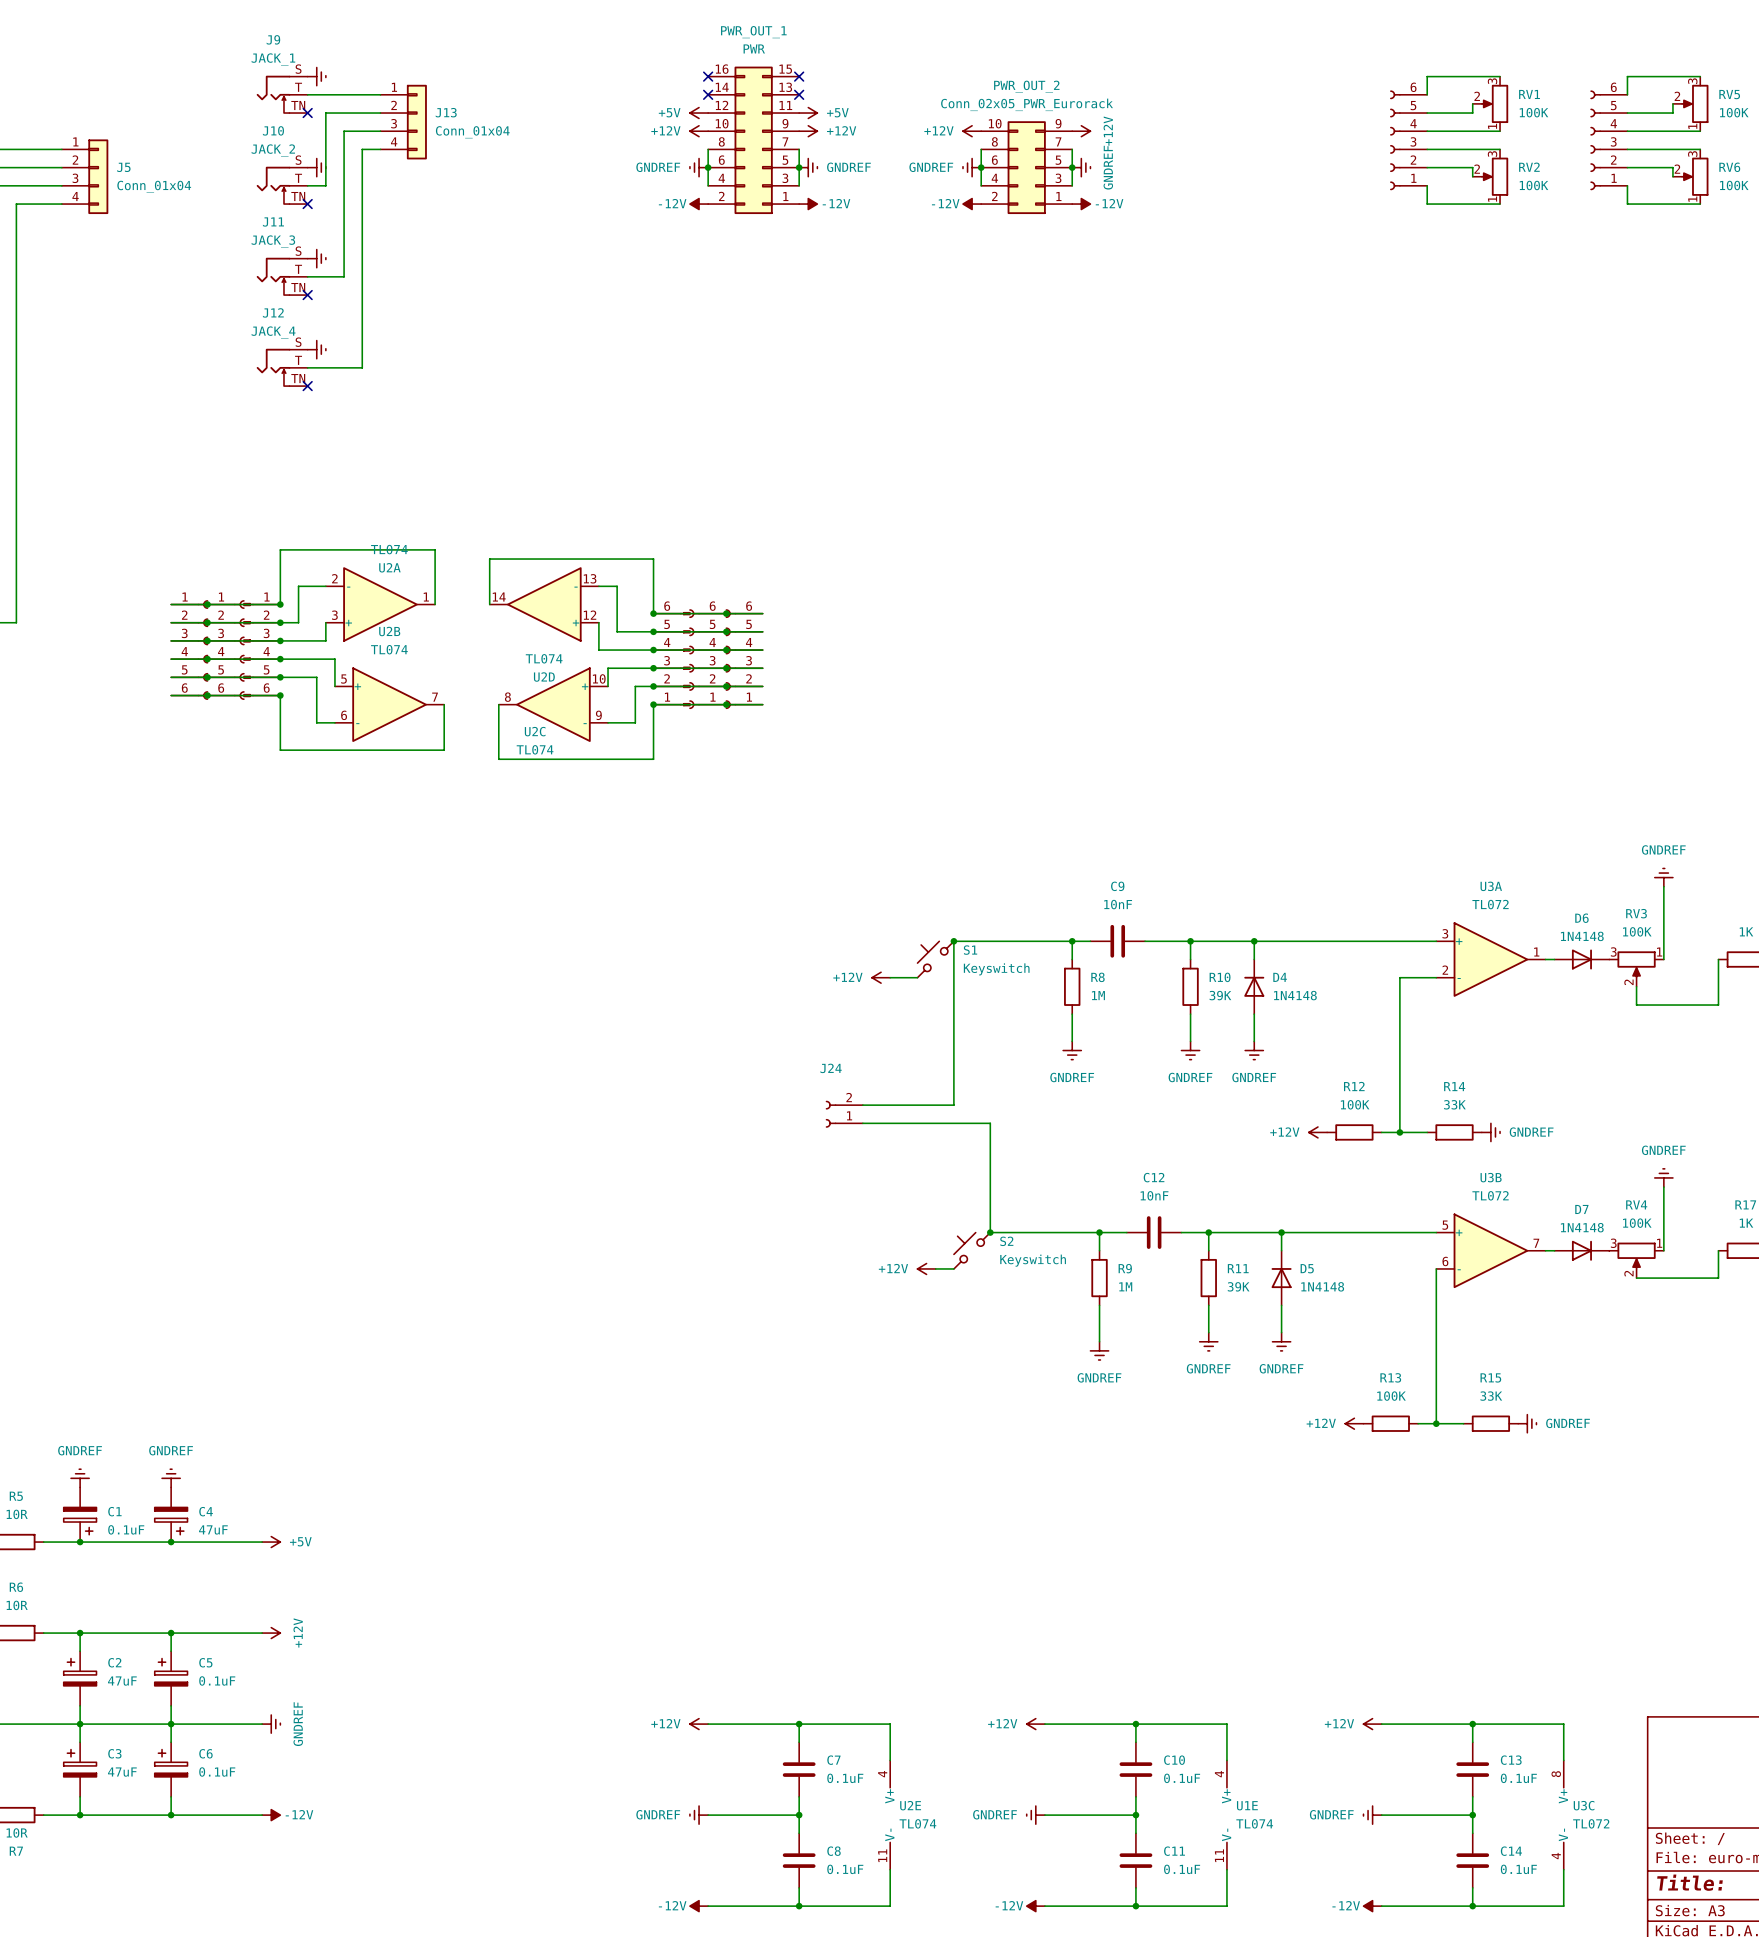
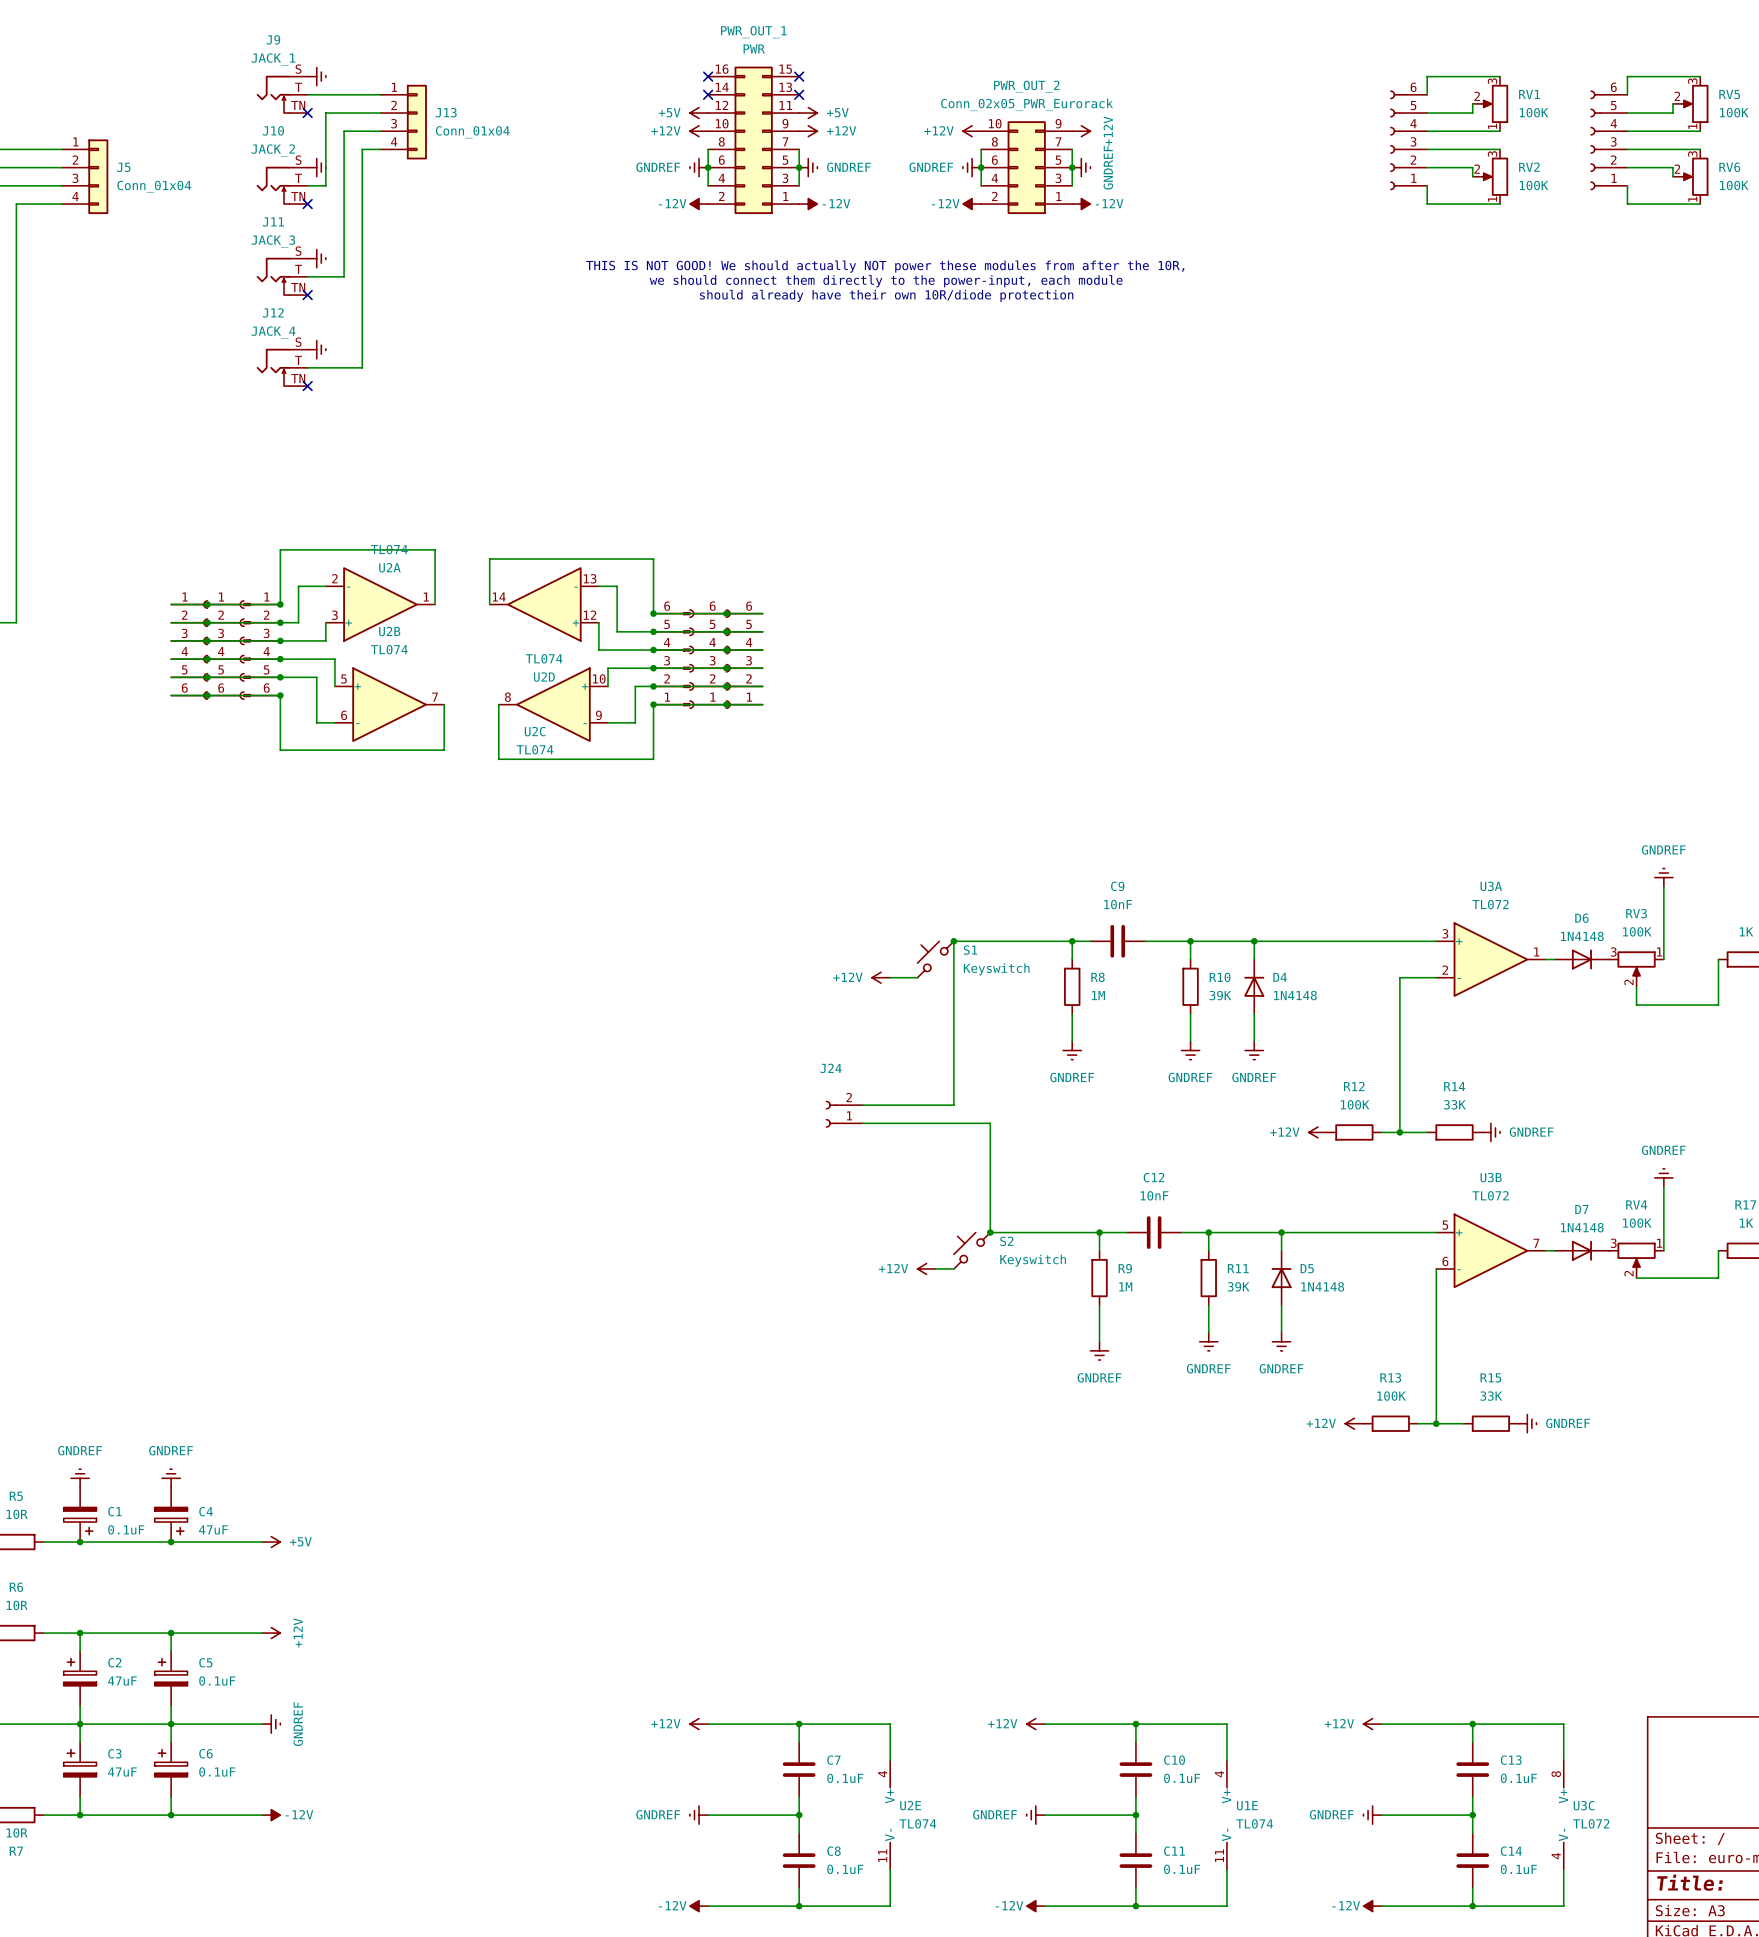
text: none -> THIS IS NOT GOOD! We should actually NOT power these modules from after the 10R, (885, 266)
text: none -> we should connect them directly to the power-input, each module (886, 281)
text: none -> should already have their own 10R/diode protection (886, 295)

